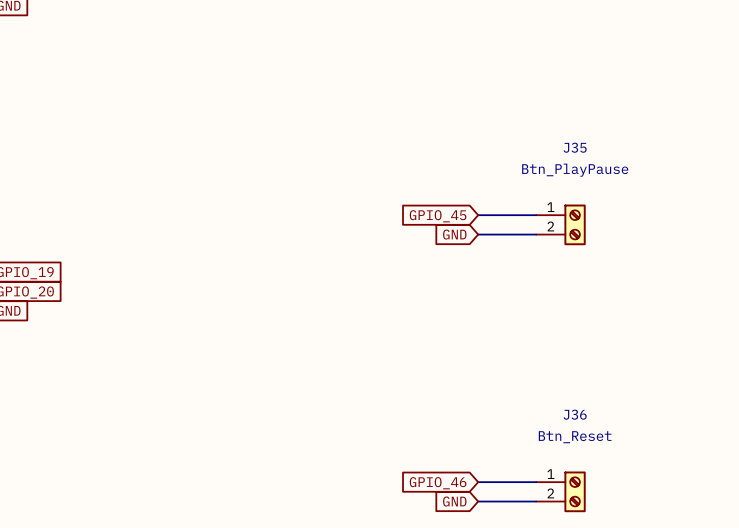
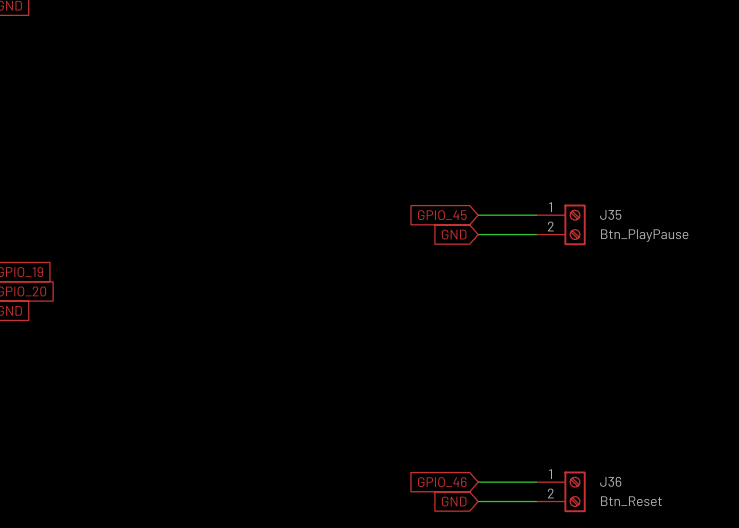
J35 name position: J35 (575, 147) -> J35 (610, 214)
J35 value position: Btn_PlayPause (575, 170) -> Btn_PlayPause (644, 235)
J36 name position: J36 (575, 414) -> J36 (610, 481)
J36 value position: Btn_Reset (575, 437) -> Btn_Reset (631, 501)

